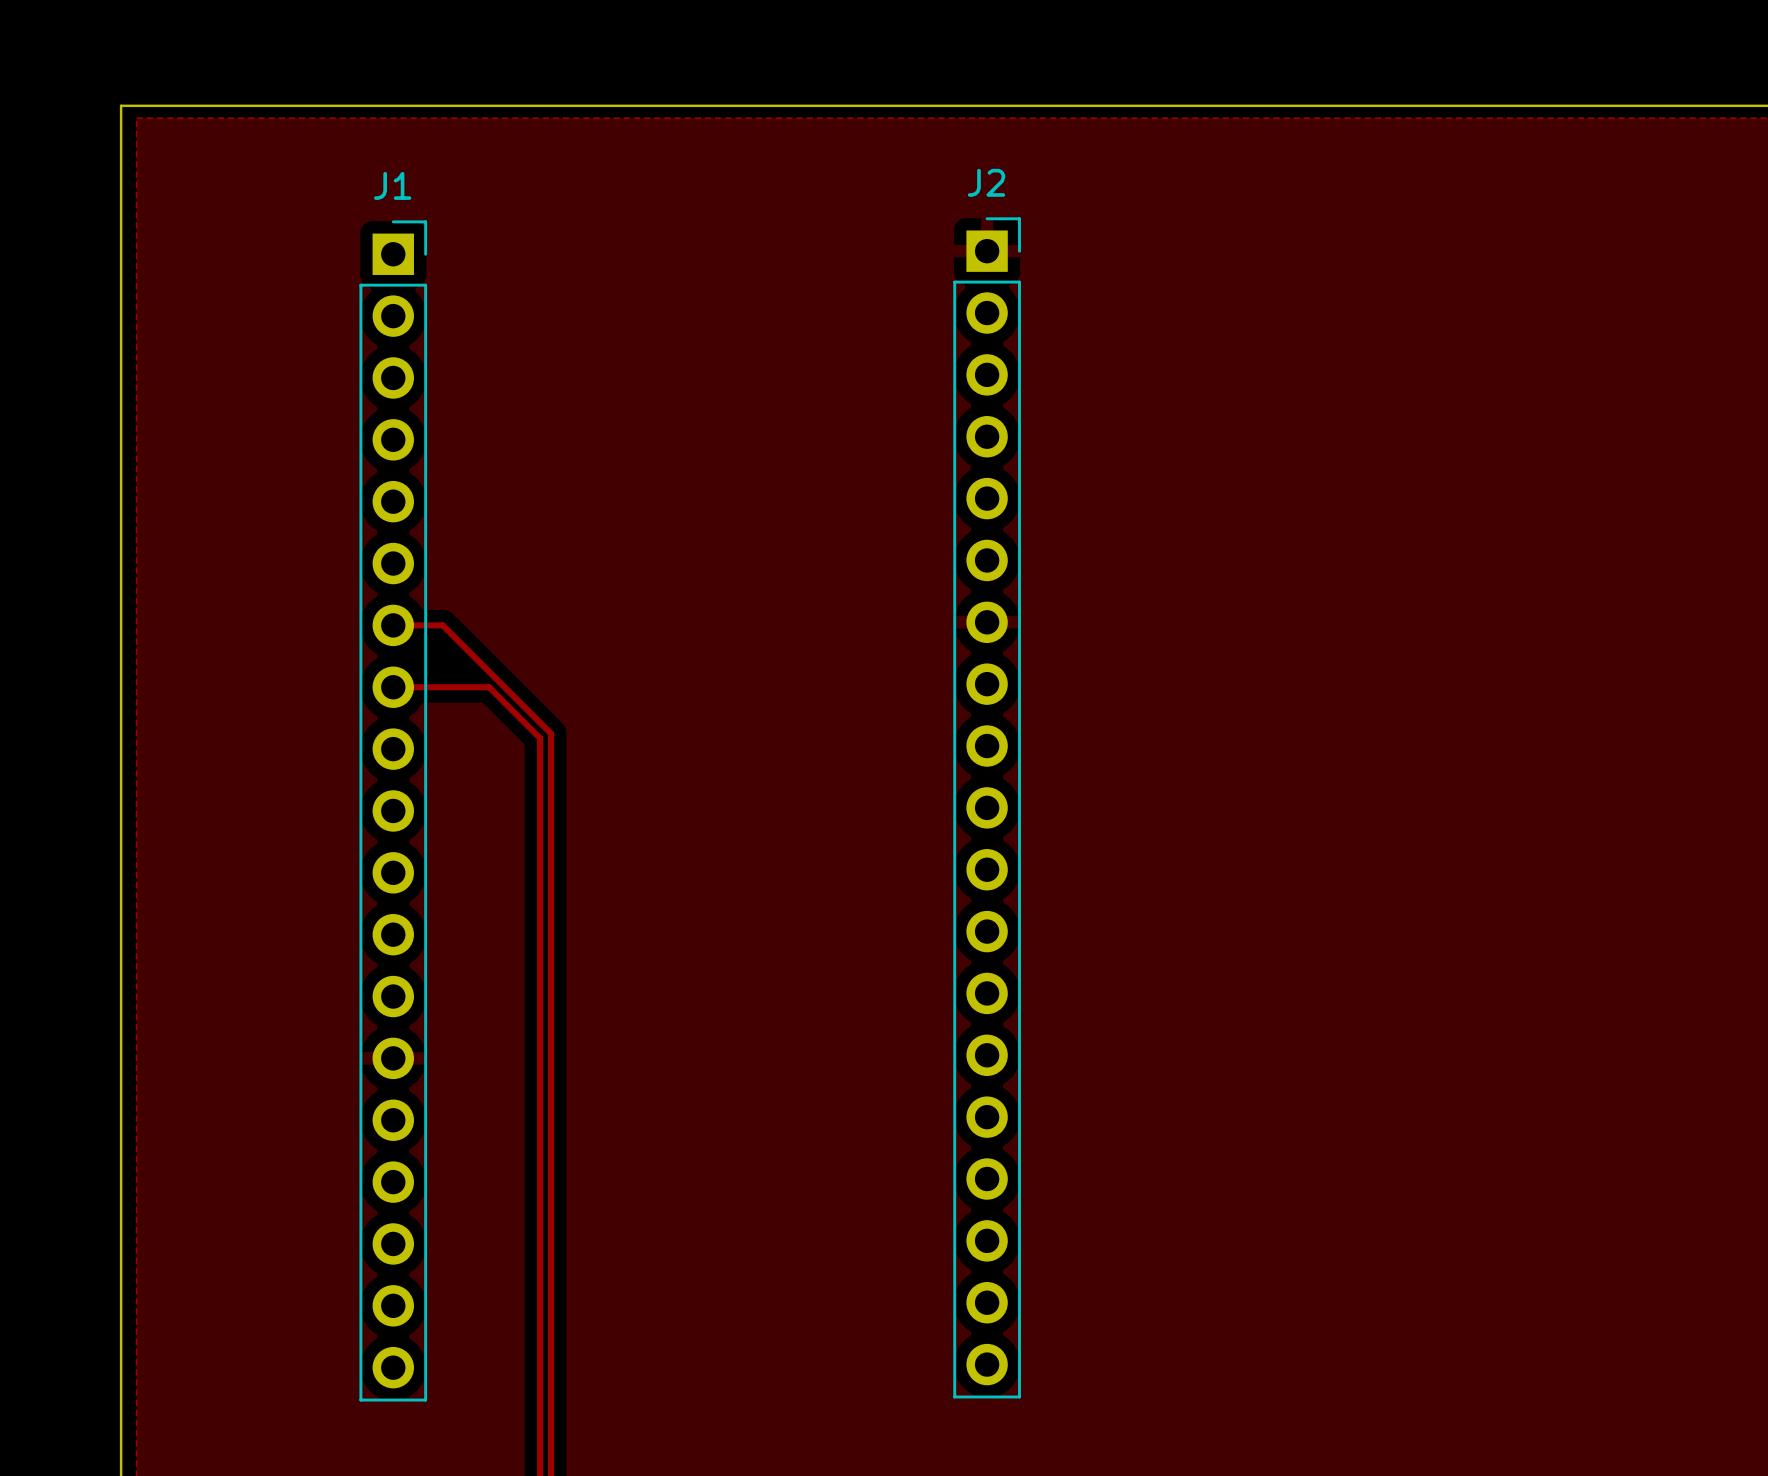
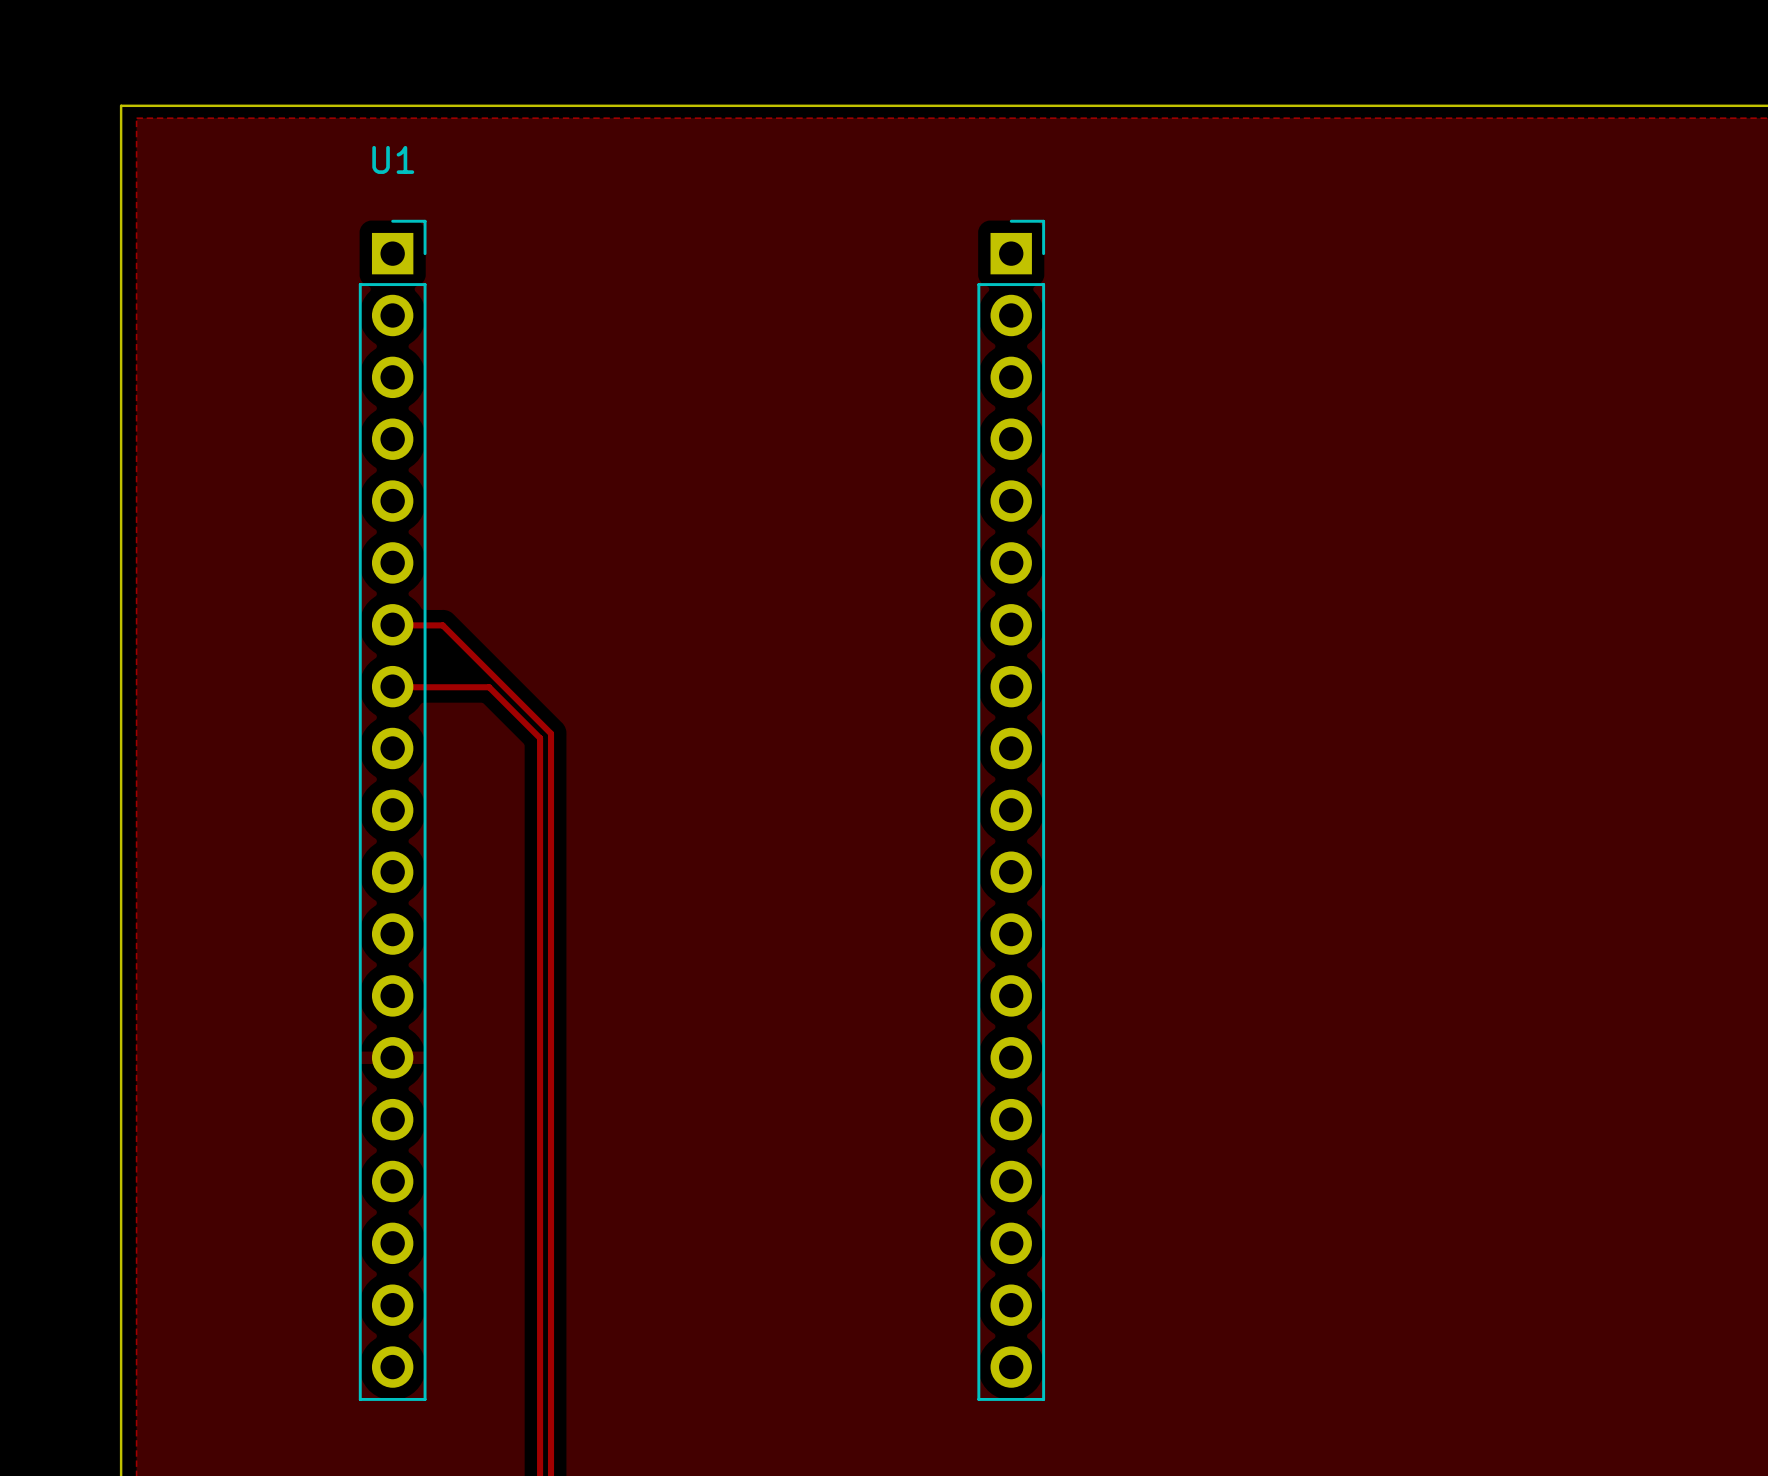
J2: (987, 807) -> none
J1: (393, 810) -> none
U1: none -> (701, 810)

